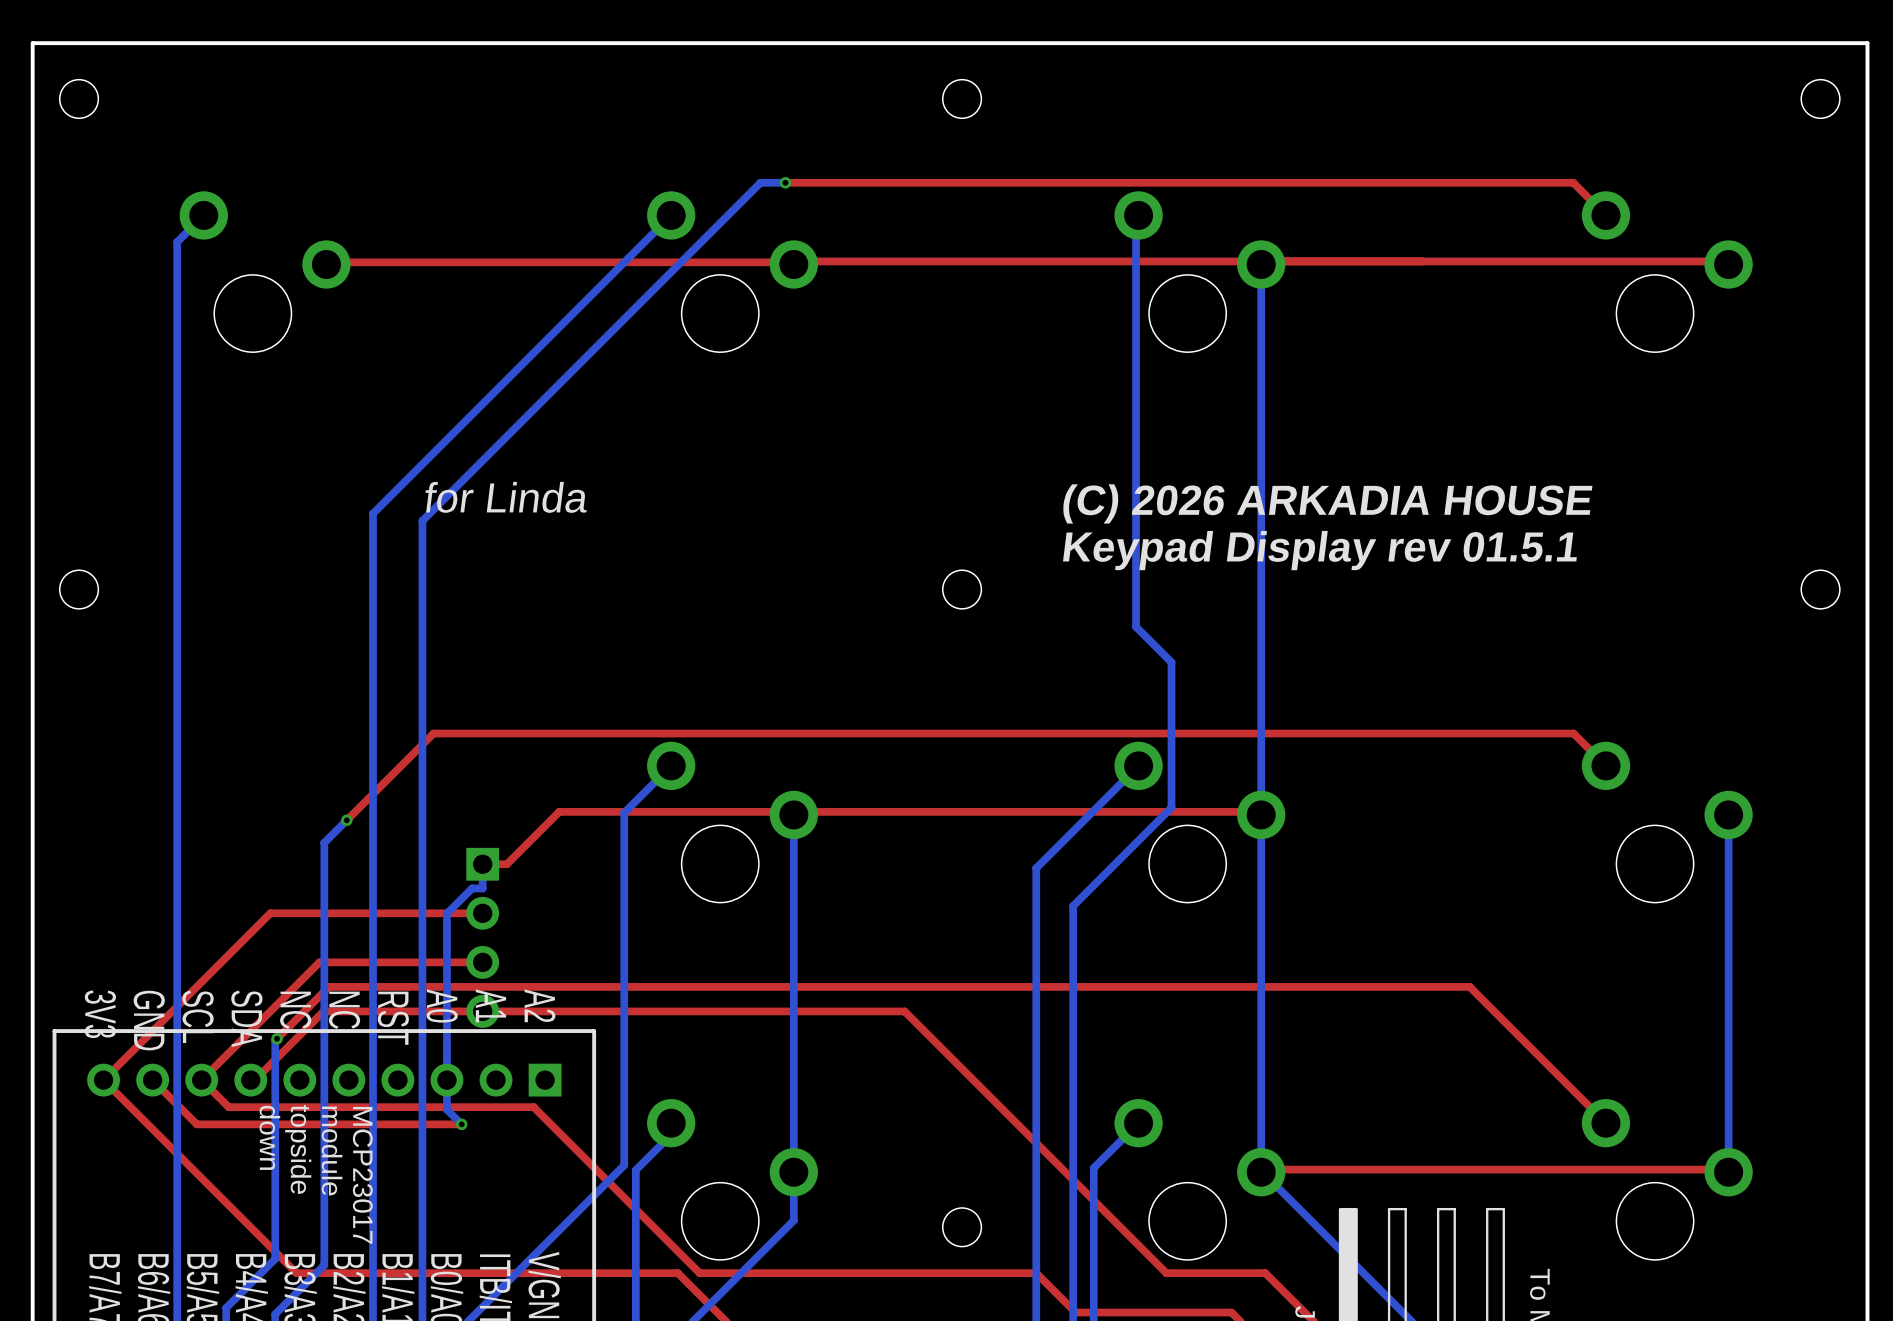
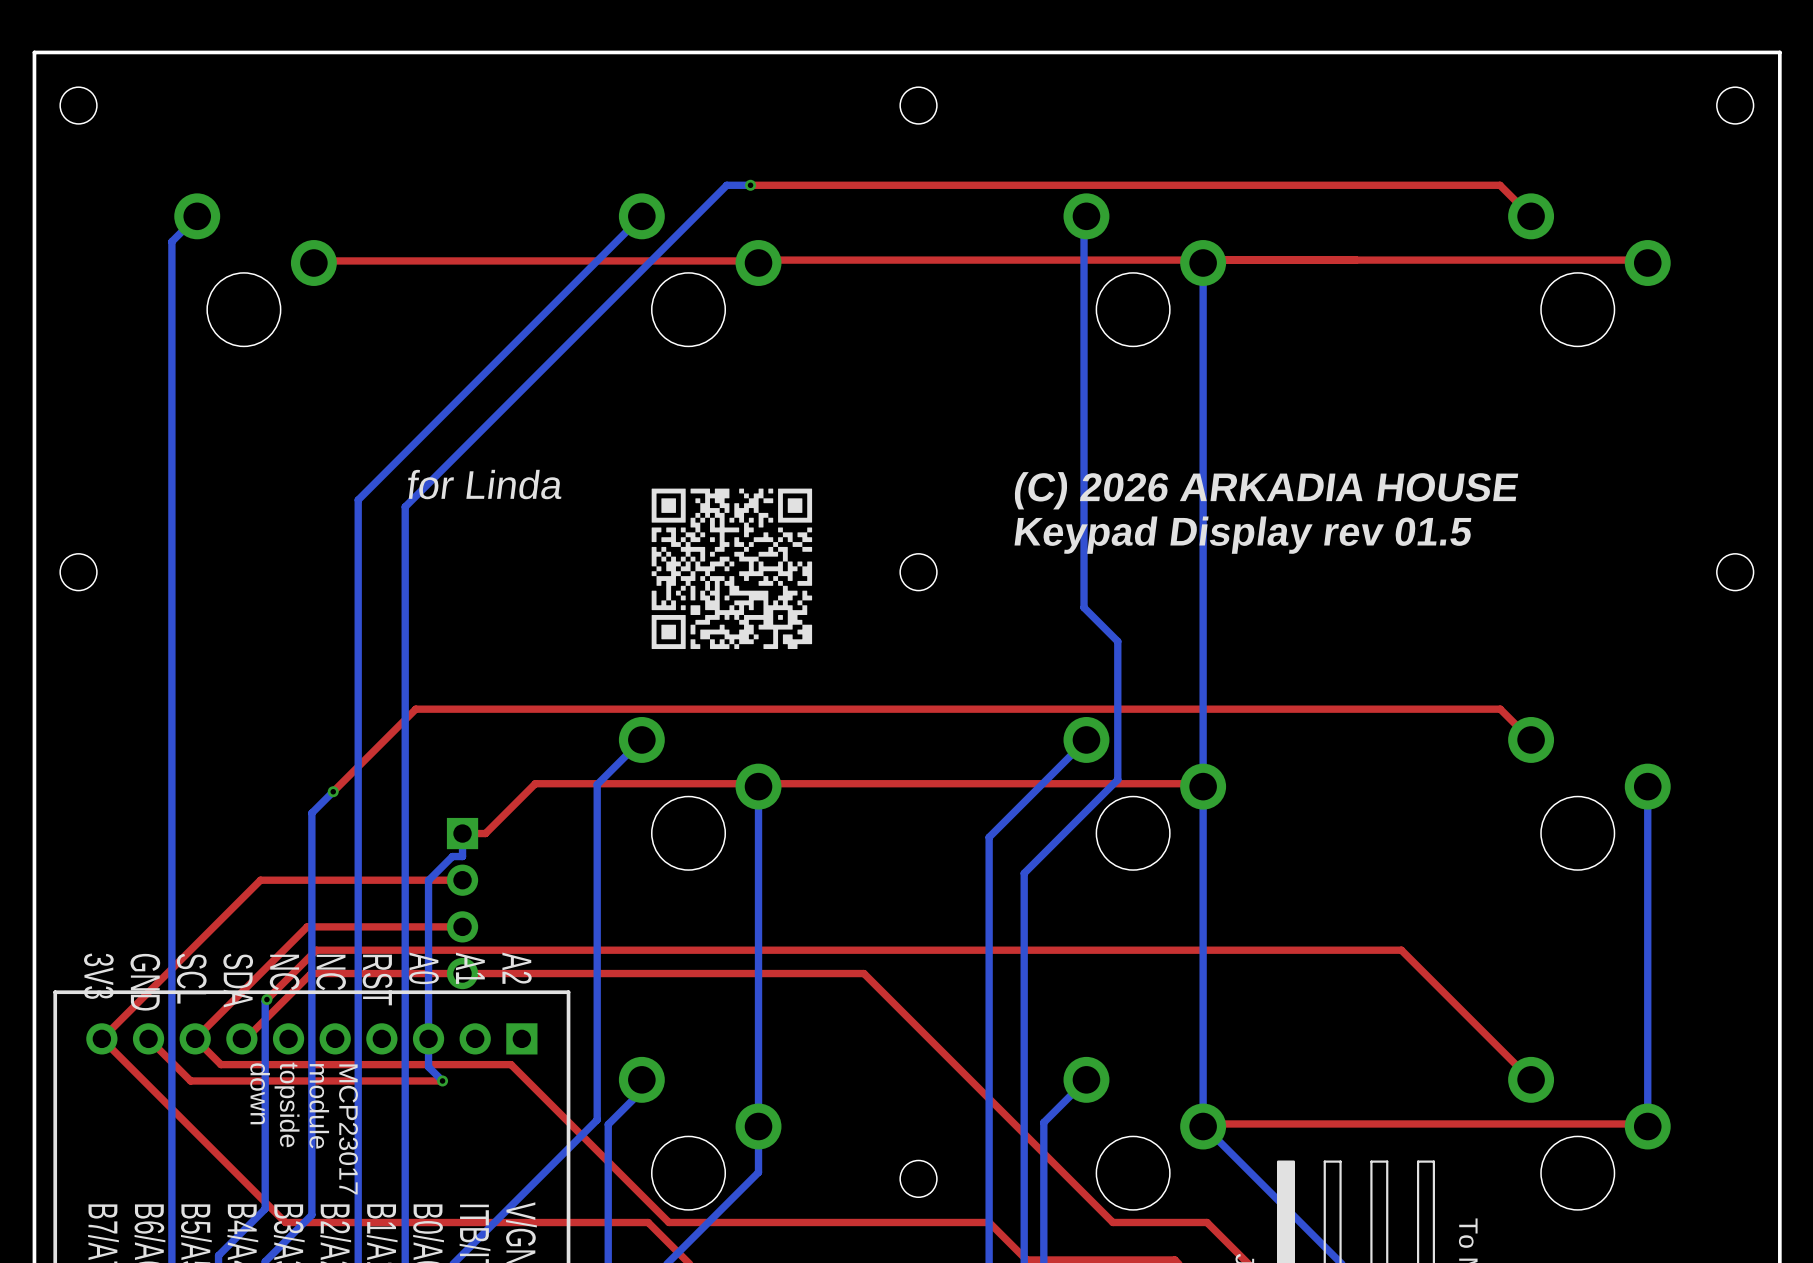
drawing: none -> [651, 488, 813, 650]
text: Keypad Display rev 01.5.1 (1319, 550) -> Keypad Display rev 01.5 (1242, 535)

